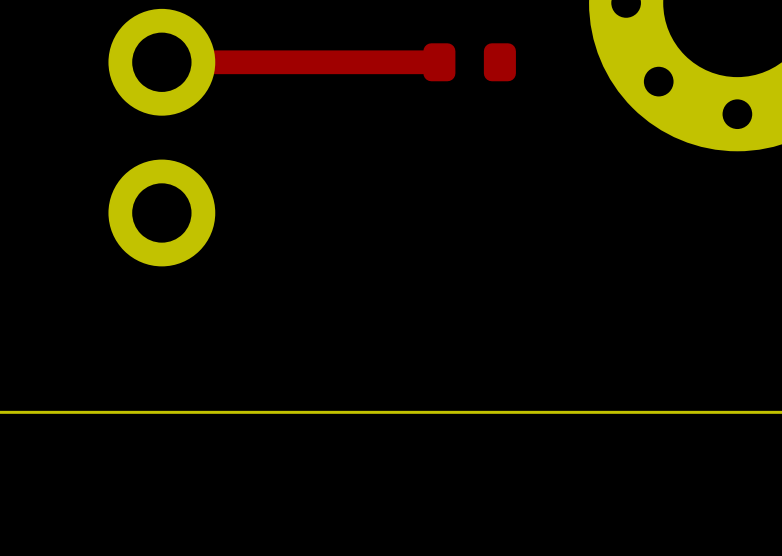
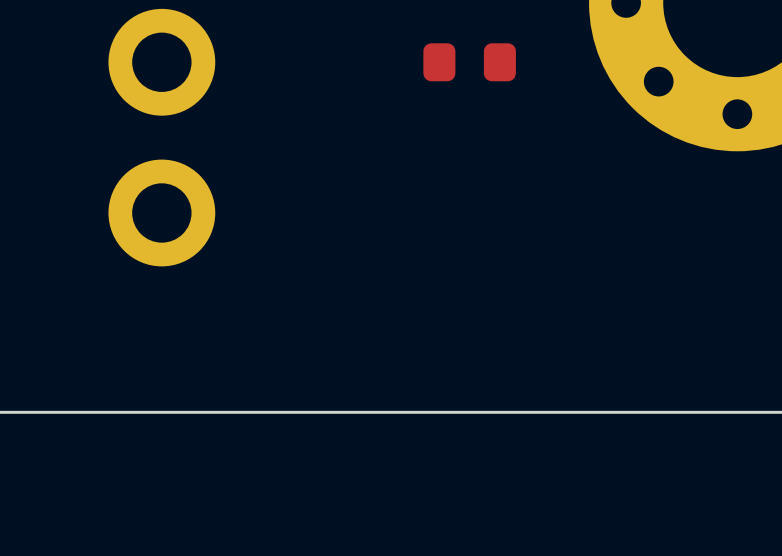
top track: (439, 62) (161, 62) -> none

